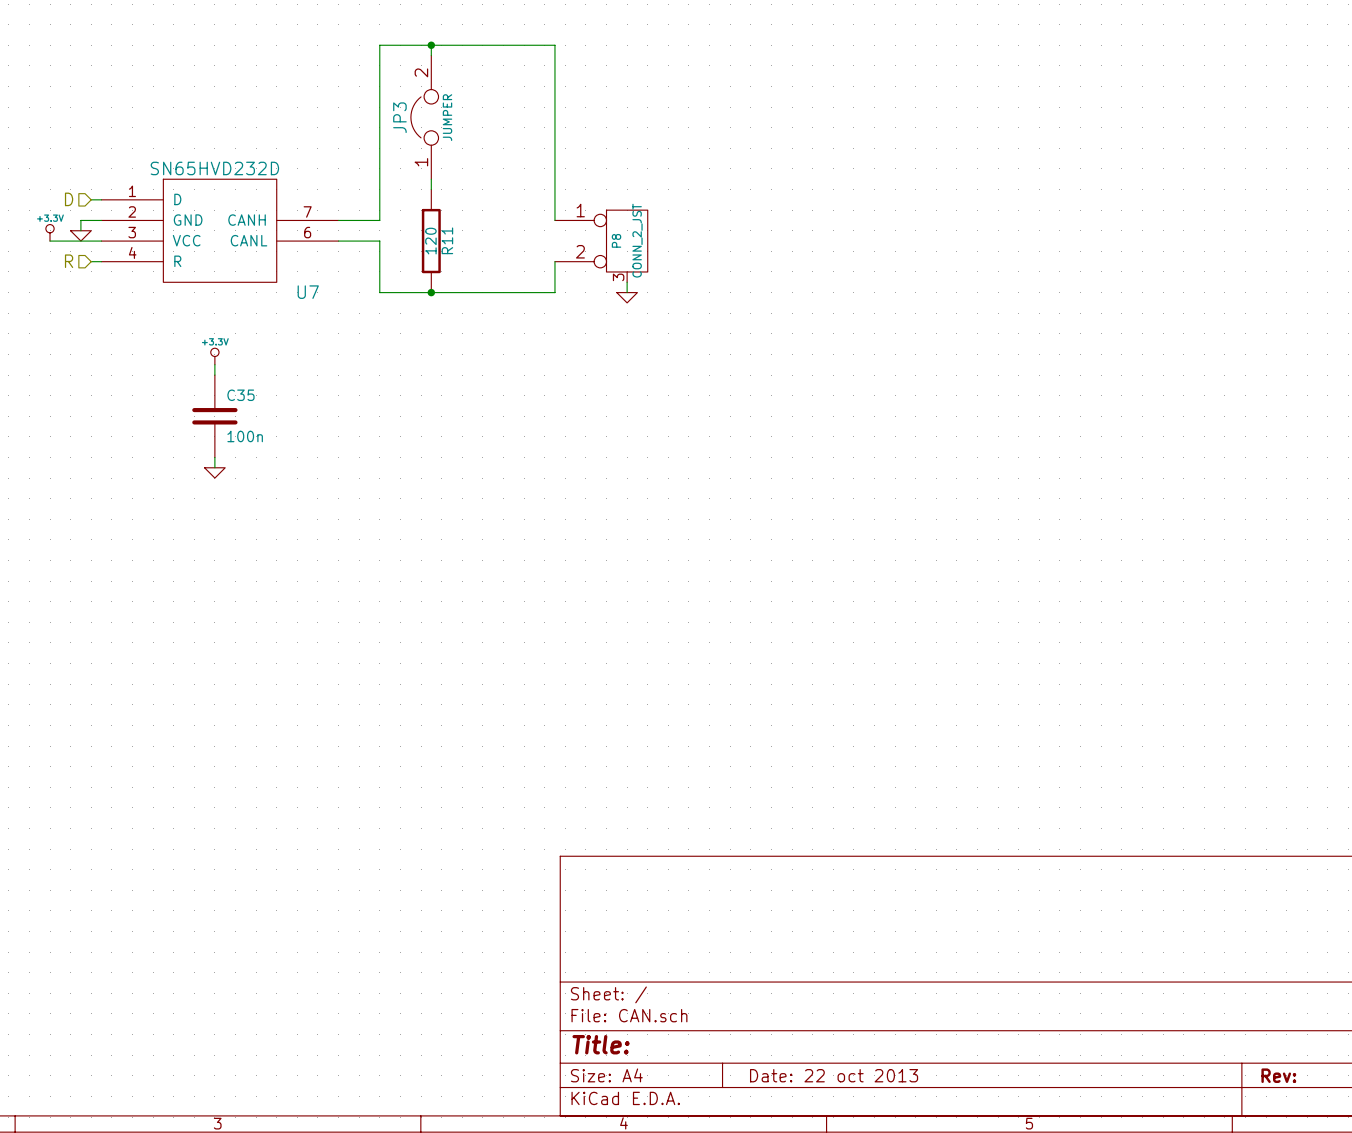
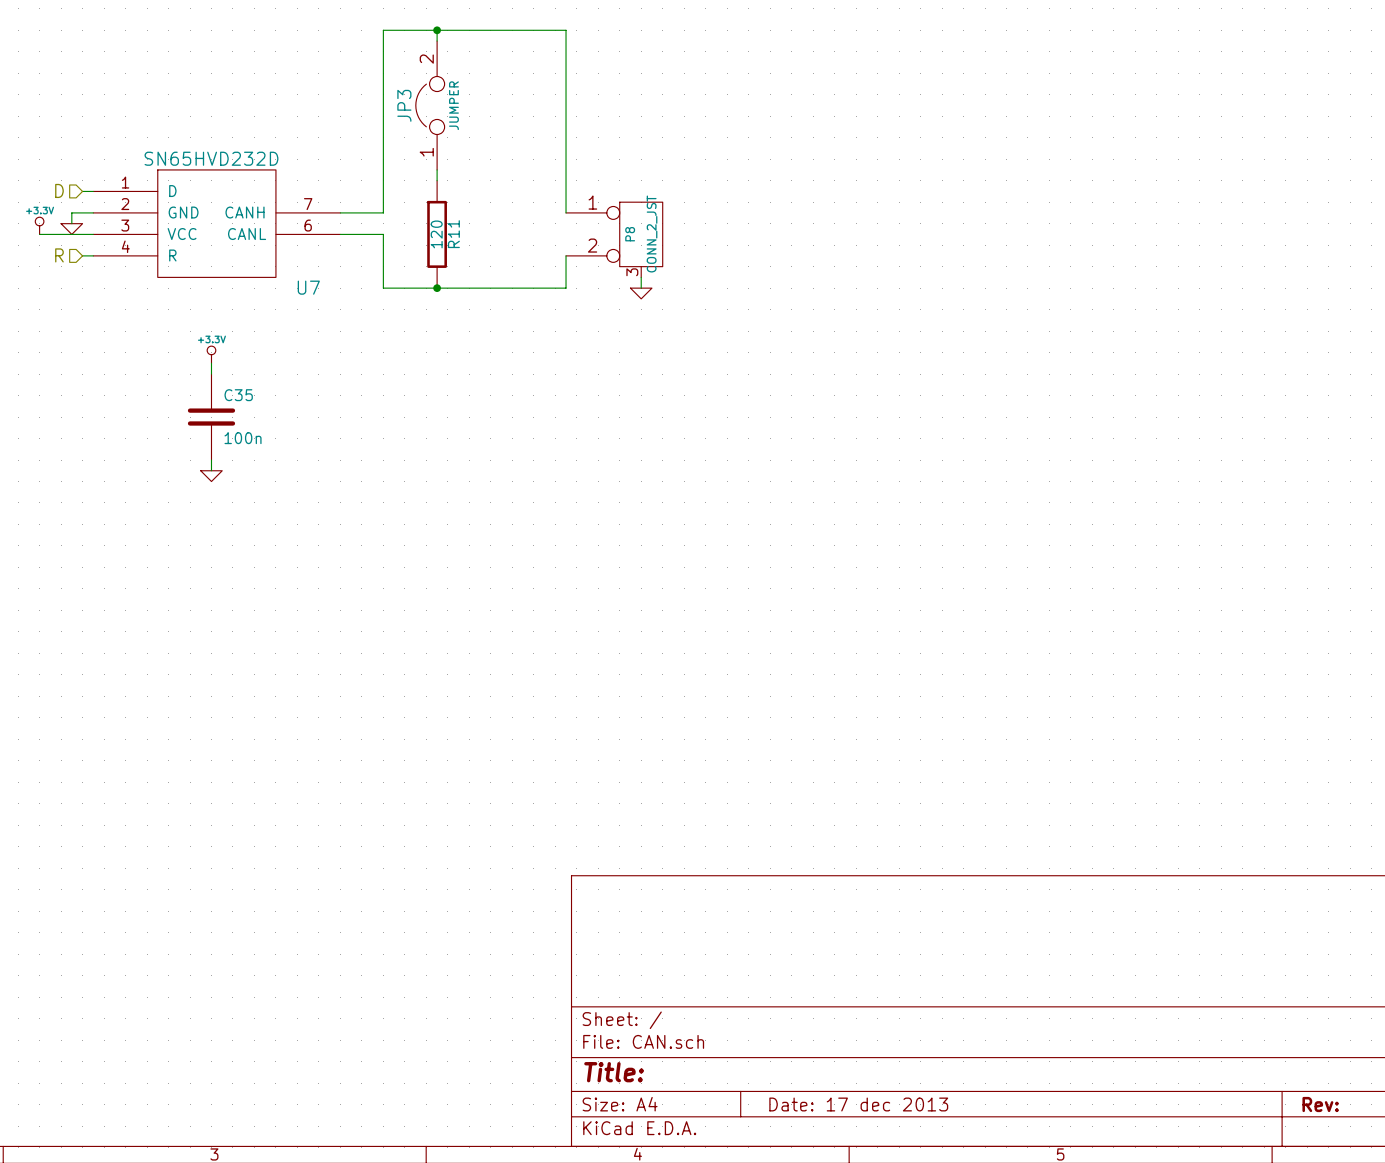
title block: Date: 22 oct 2013 (834, 1075) -> Date: 17 dec 2013 (858, 1104)

